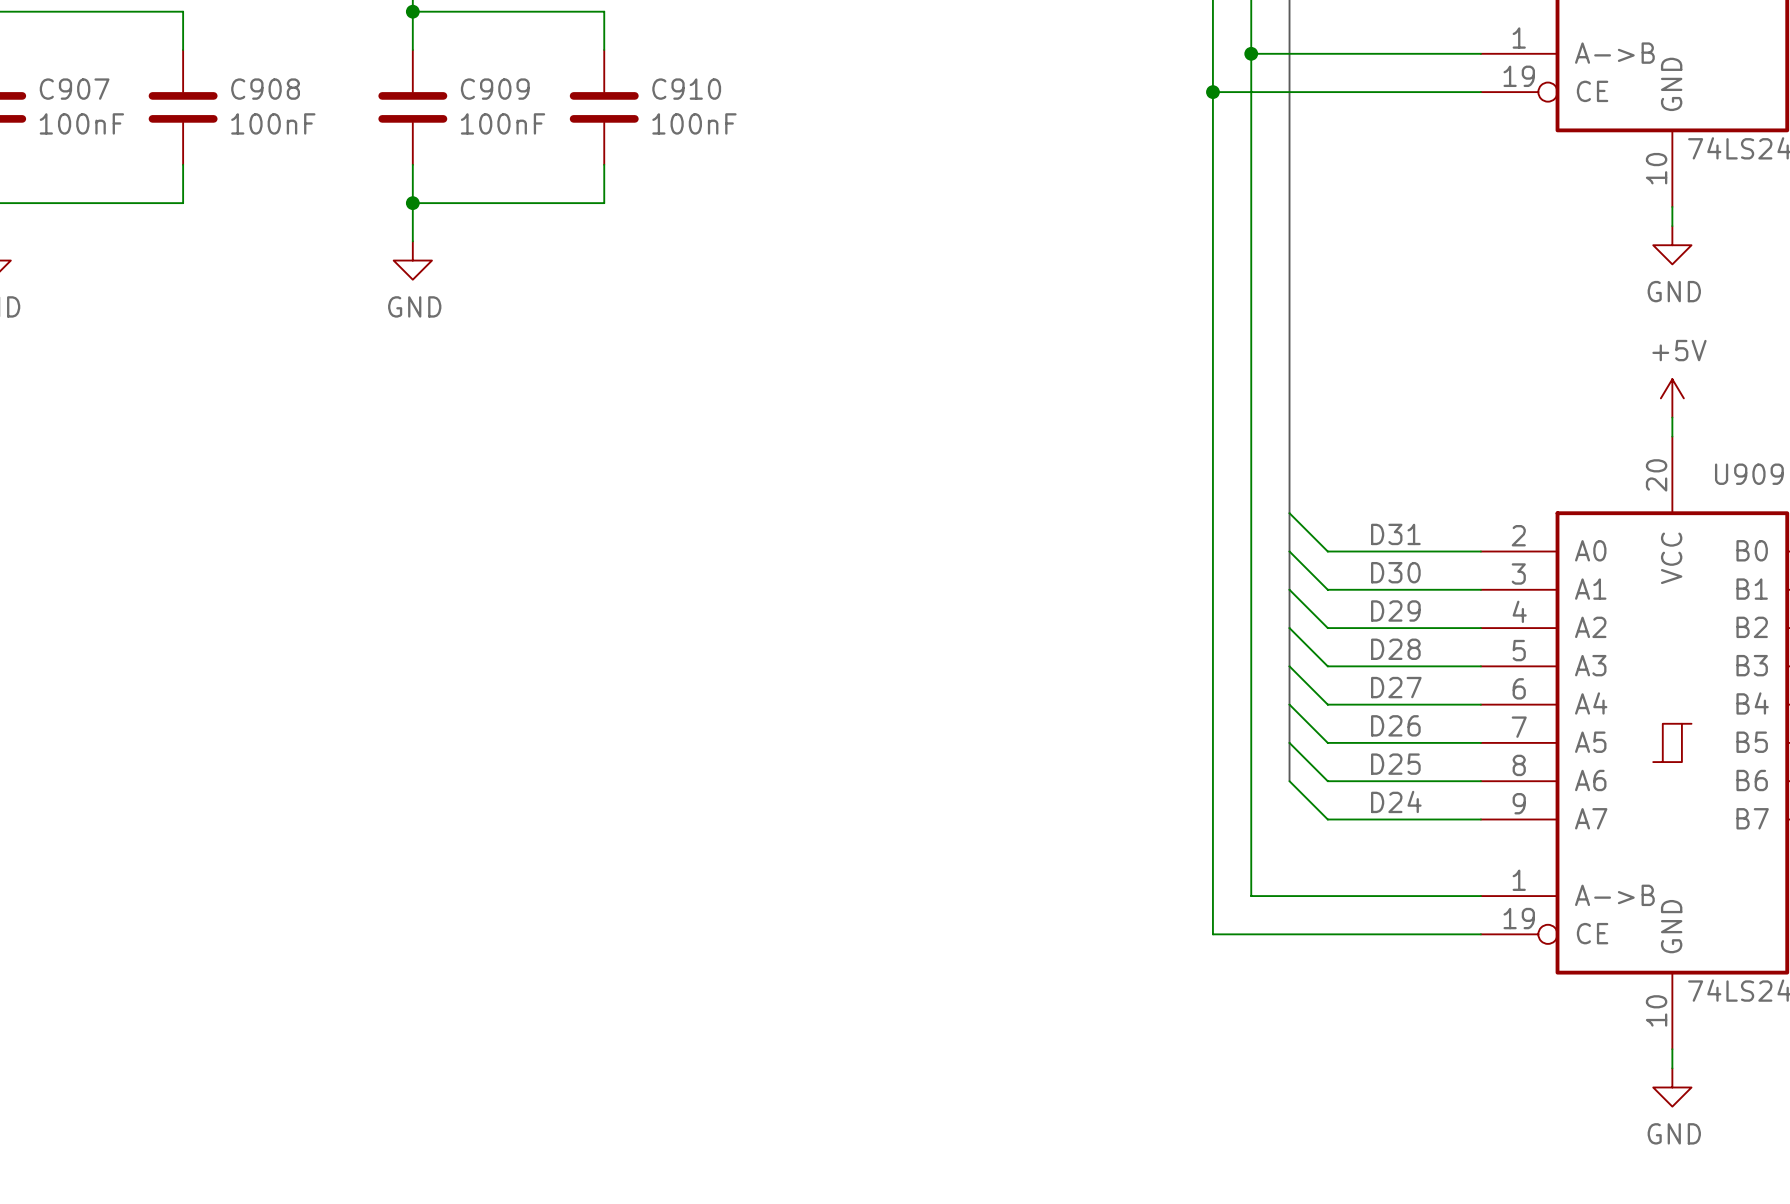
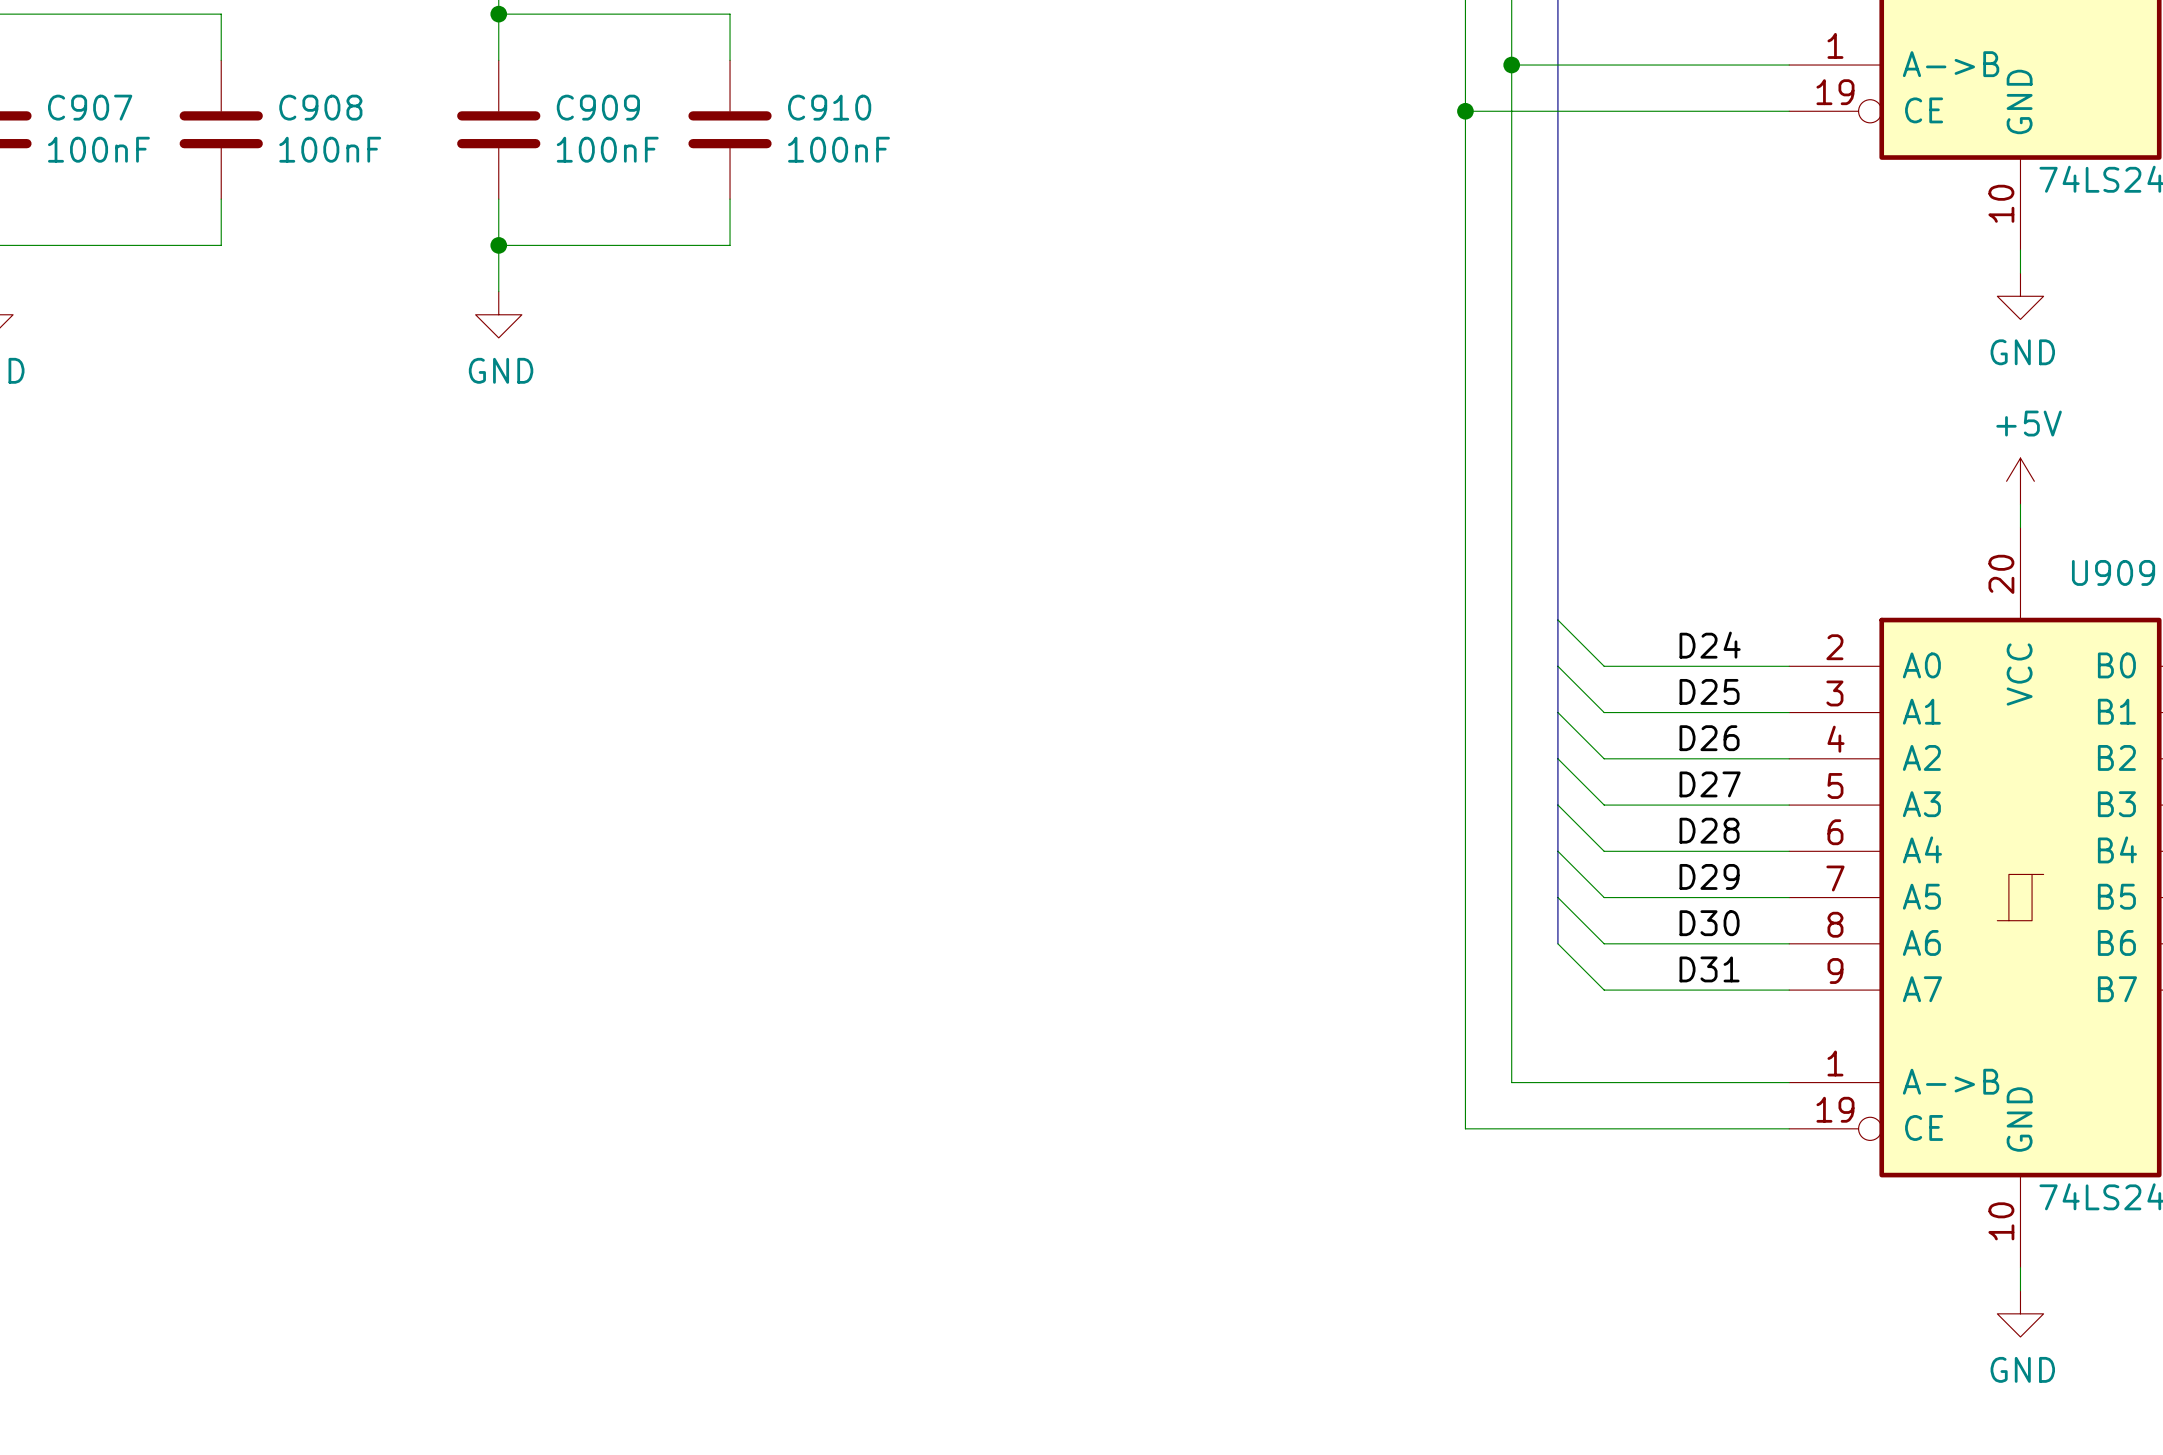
label position: D31 (1395, 534) -> D31 (1709, 969)
label position: D30 (1395, 572) -> D30 (1709, 923)
label position: D29 (1395, 610) -> D29 (1709, 876)
label position: D28 (1395, 649) -> D28 (1709, 830)
label position: D27 (1396, 687) -> D27 (1710, 784)
label position: D26 (1395, 725) -> D26 (1709, 738)
label position: D25 (1395, 764) -> D25 (1709, 691)
label position: D24 (1396, 801) -> D24 (1710, 645)

